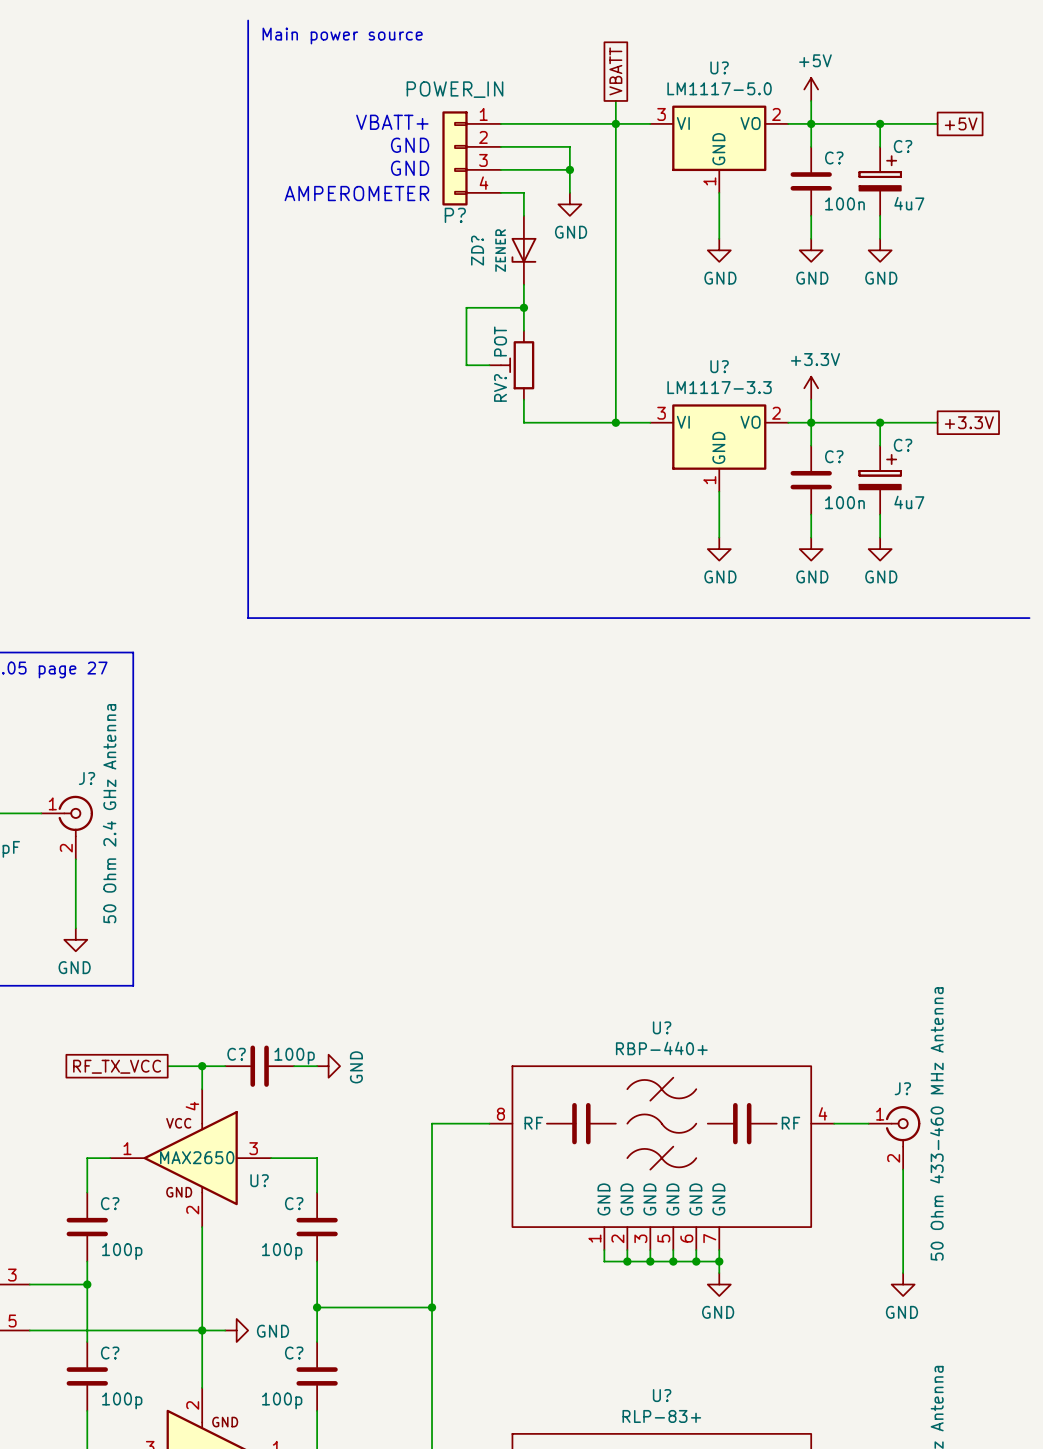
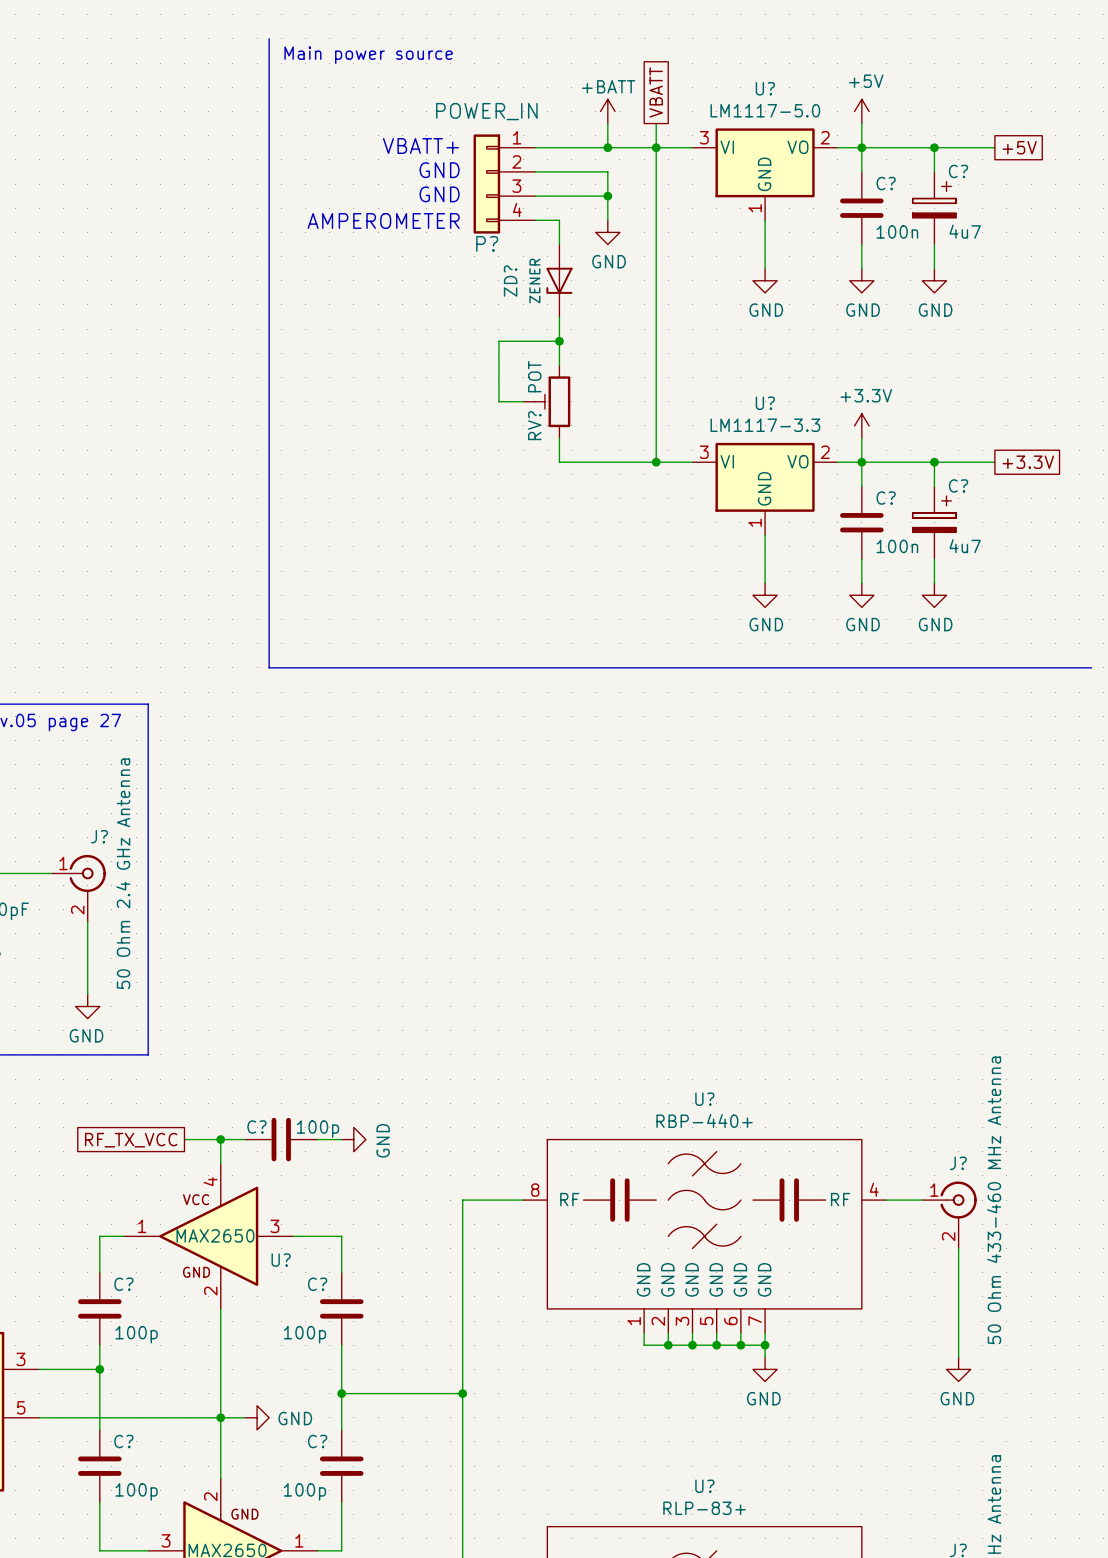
power symbol: none -> +BATT (607, 111)
wire: none -> (607, 123) (607, 147)
junction: none -> (607, 147)

